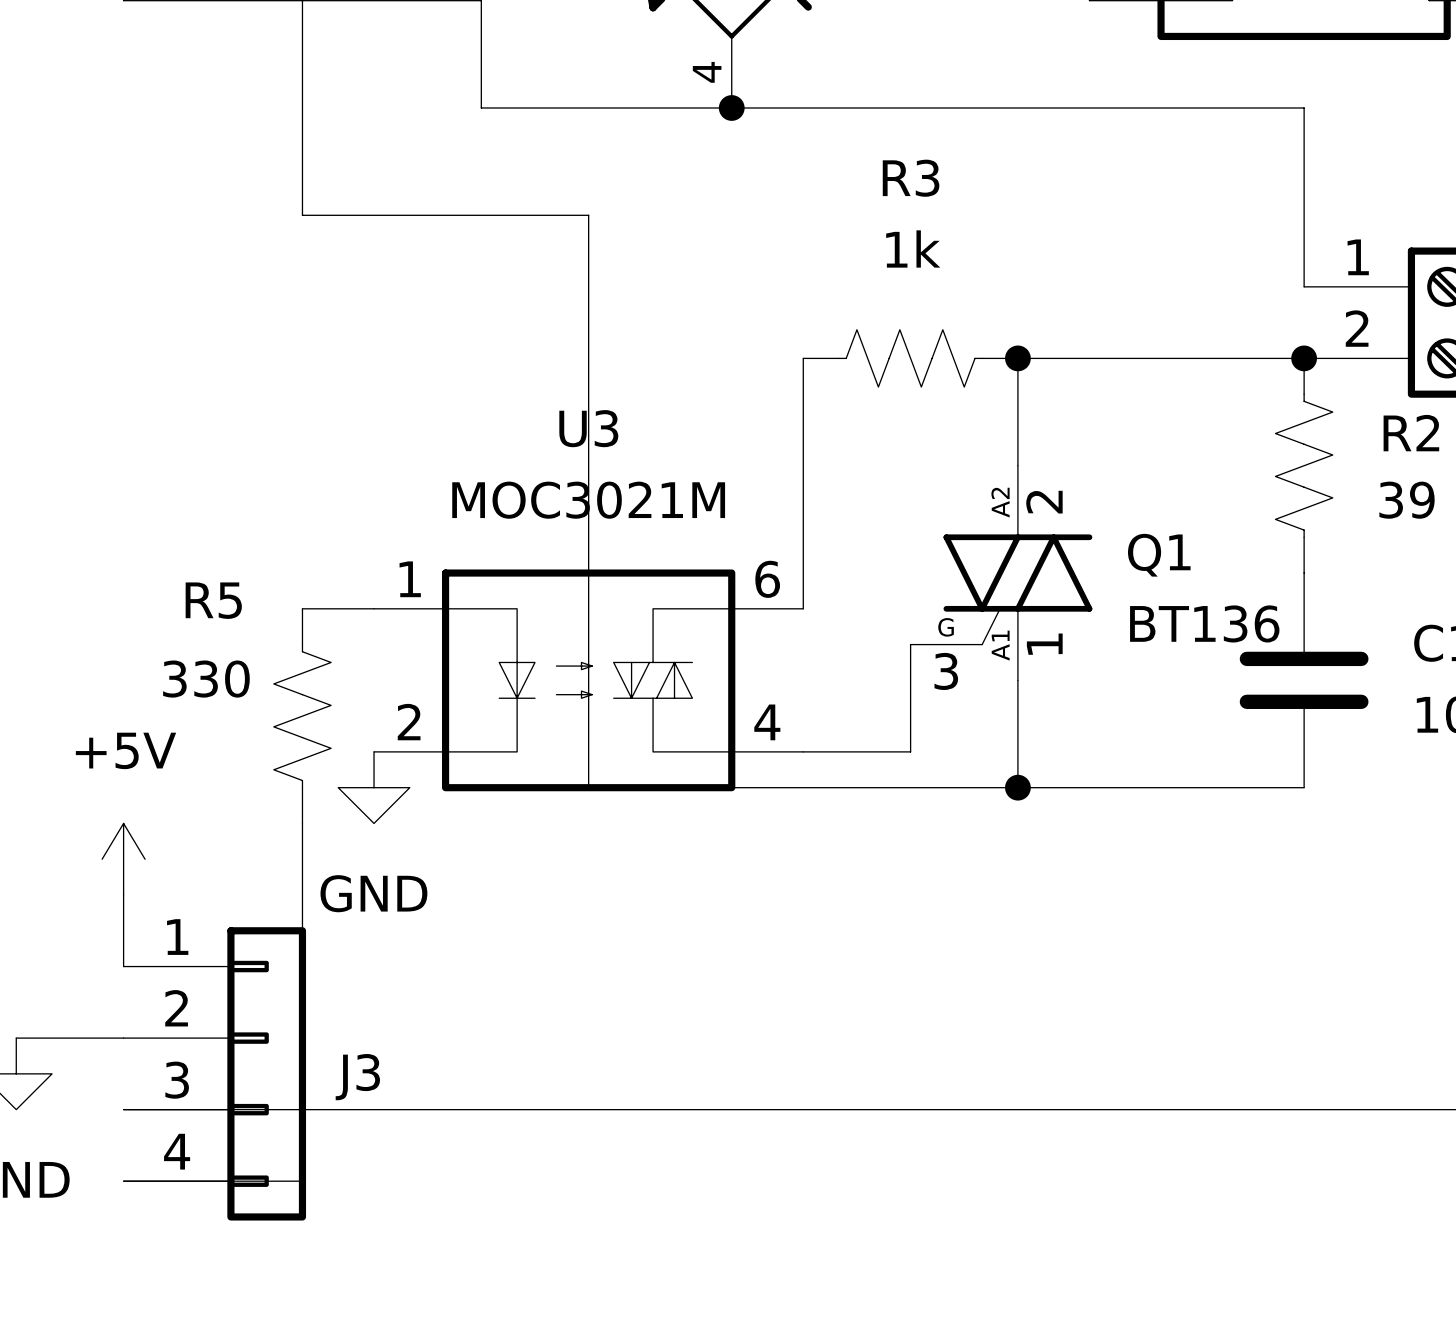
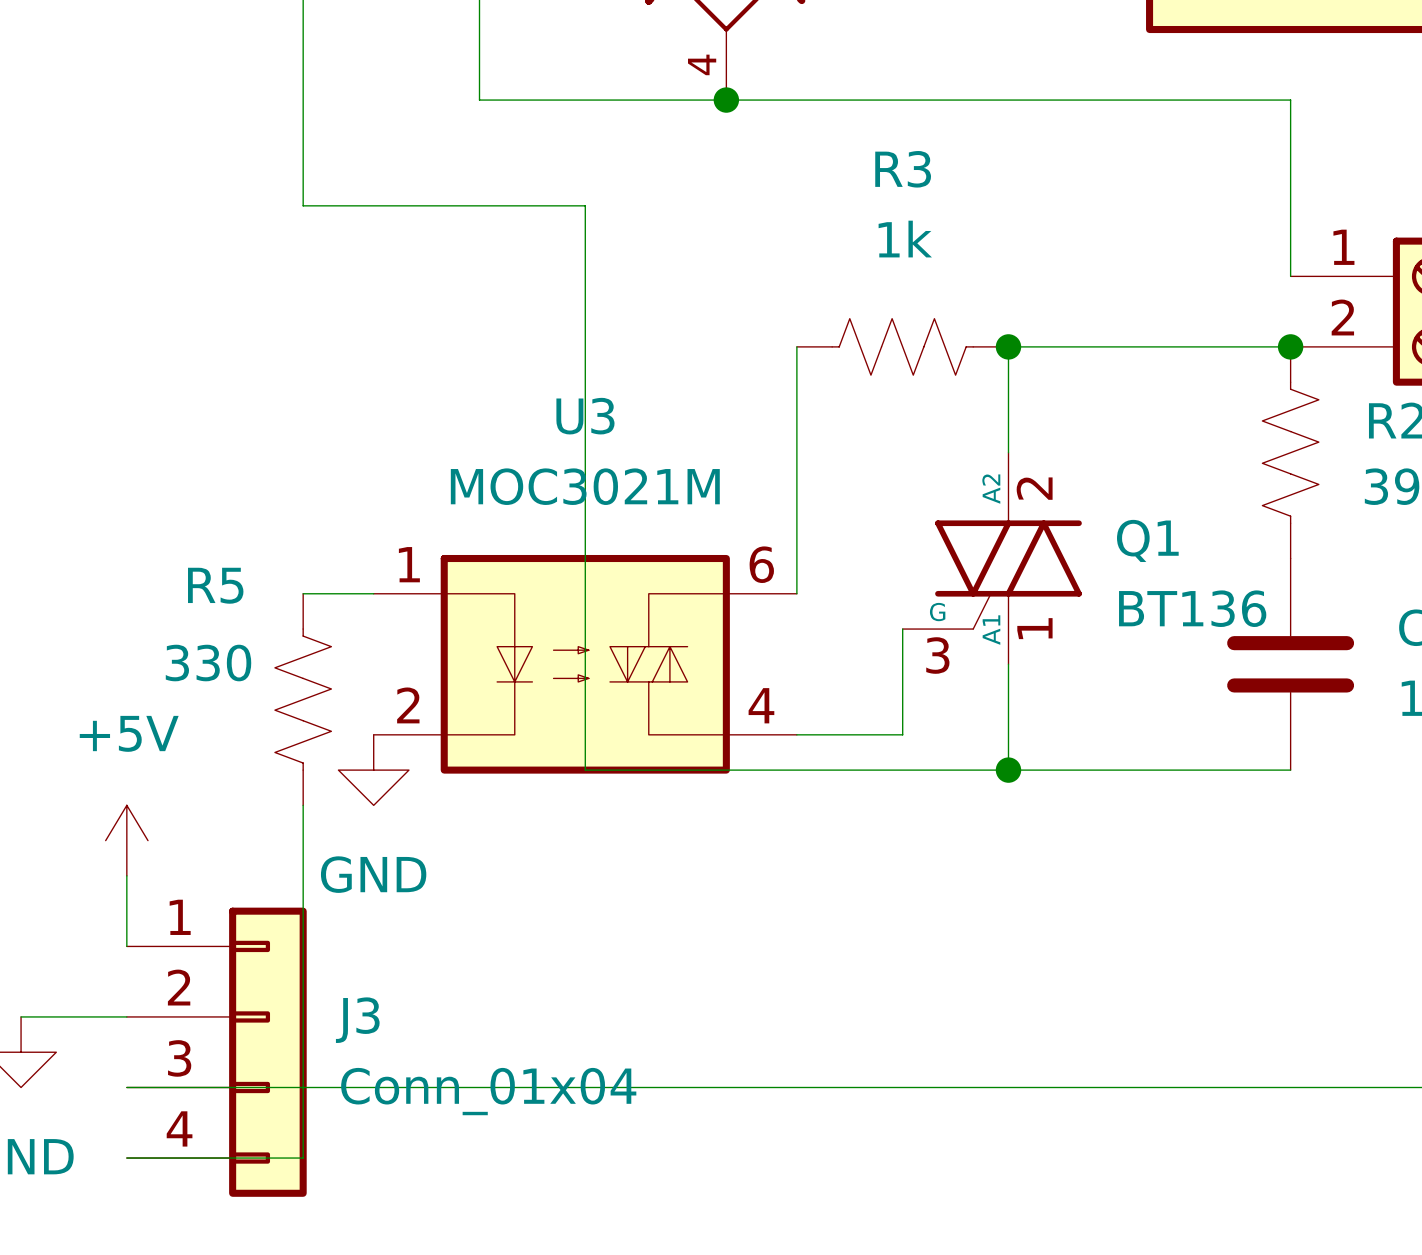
J3 name position: J3 (357, 1077) -> J3 (357, 1020)
J3 value: none -> Conn_01x04 (488, 1091)

